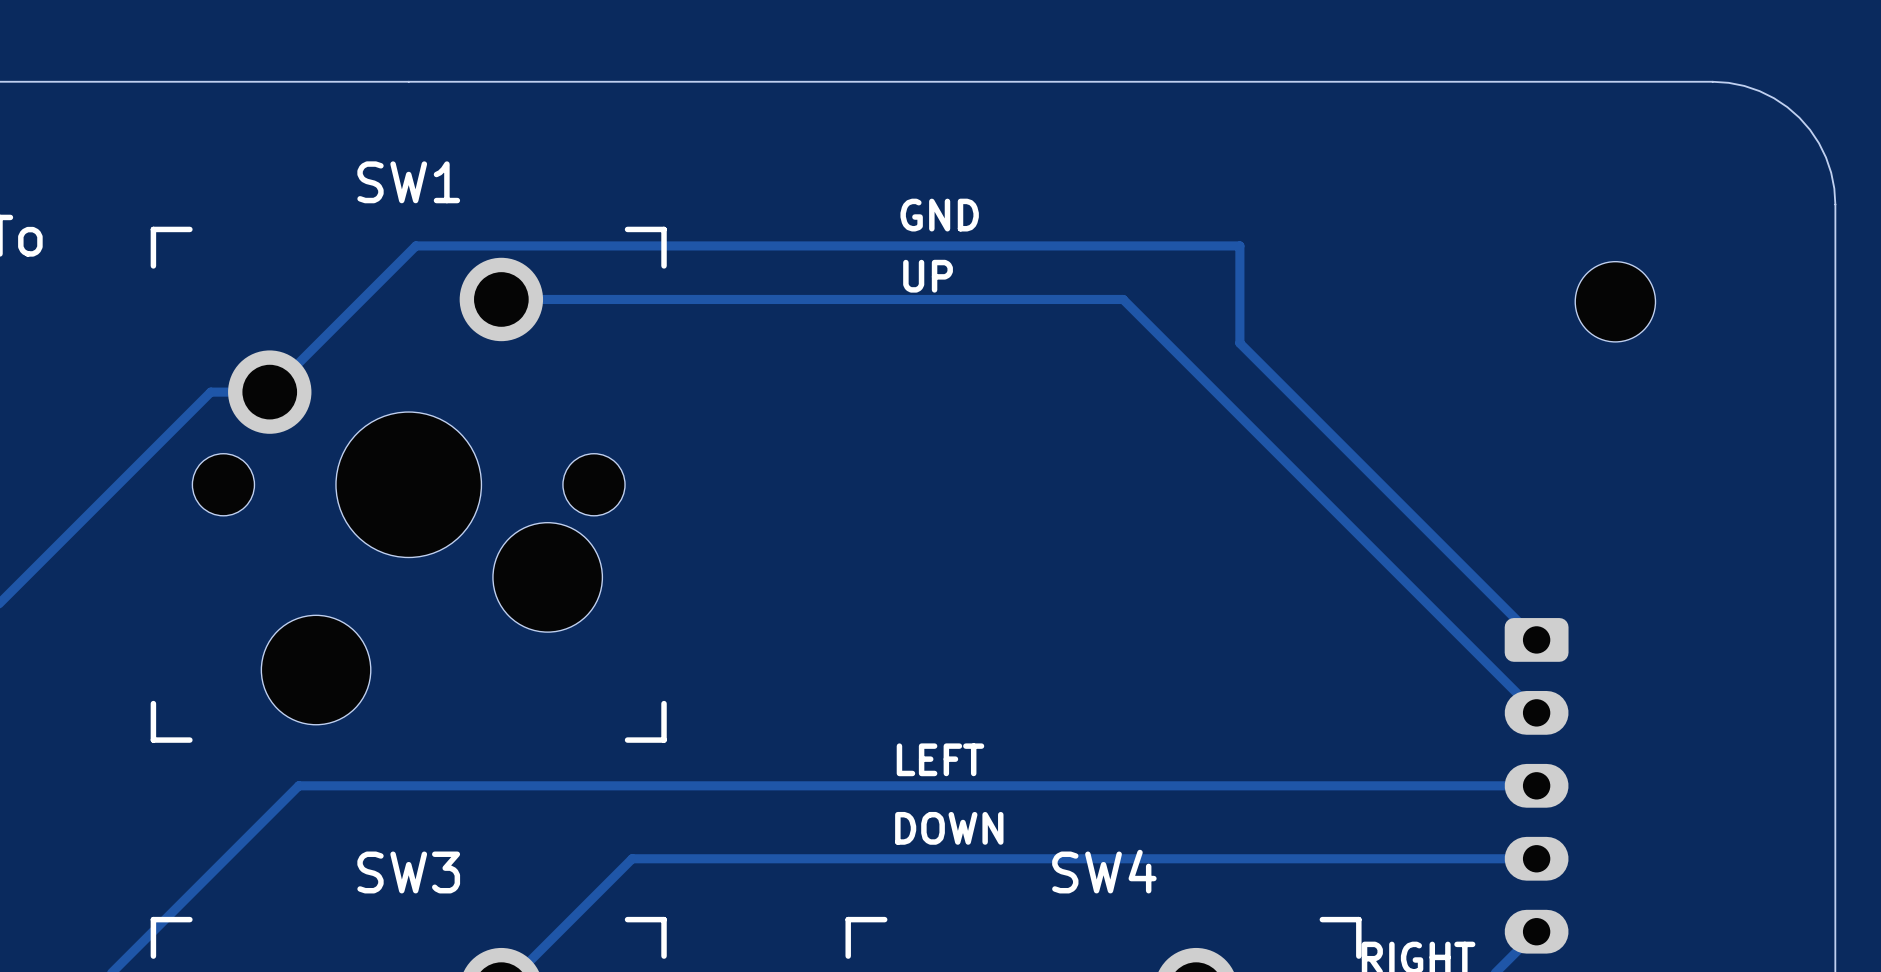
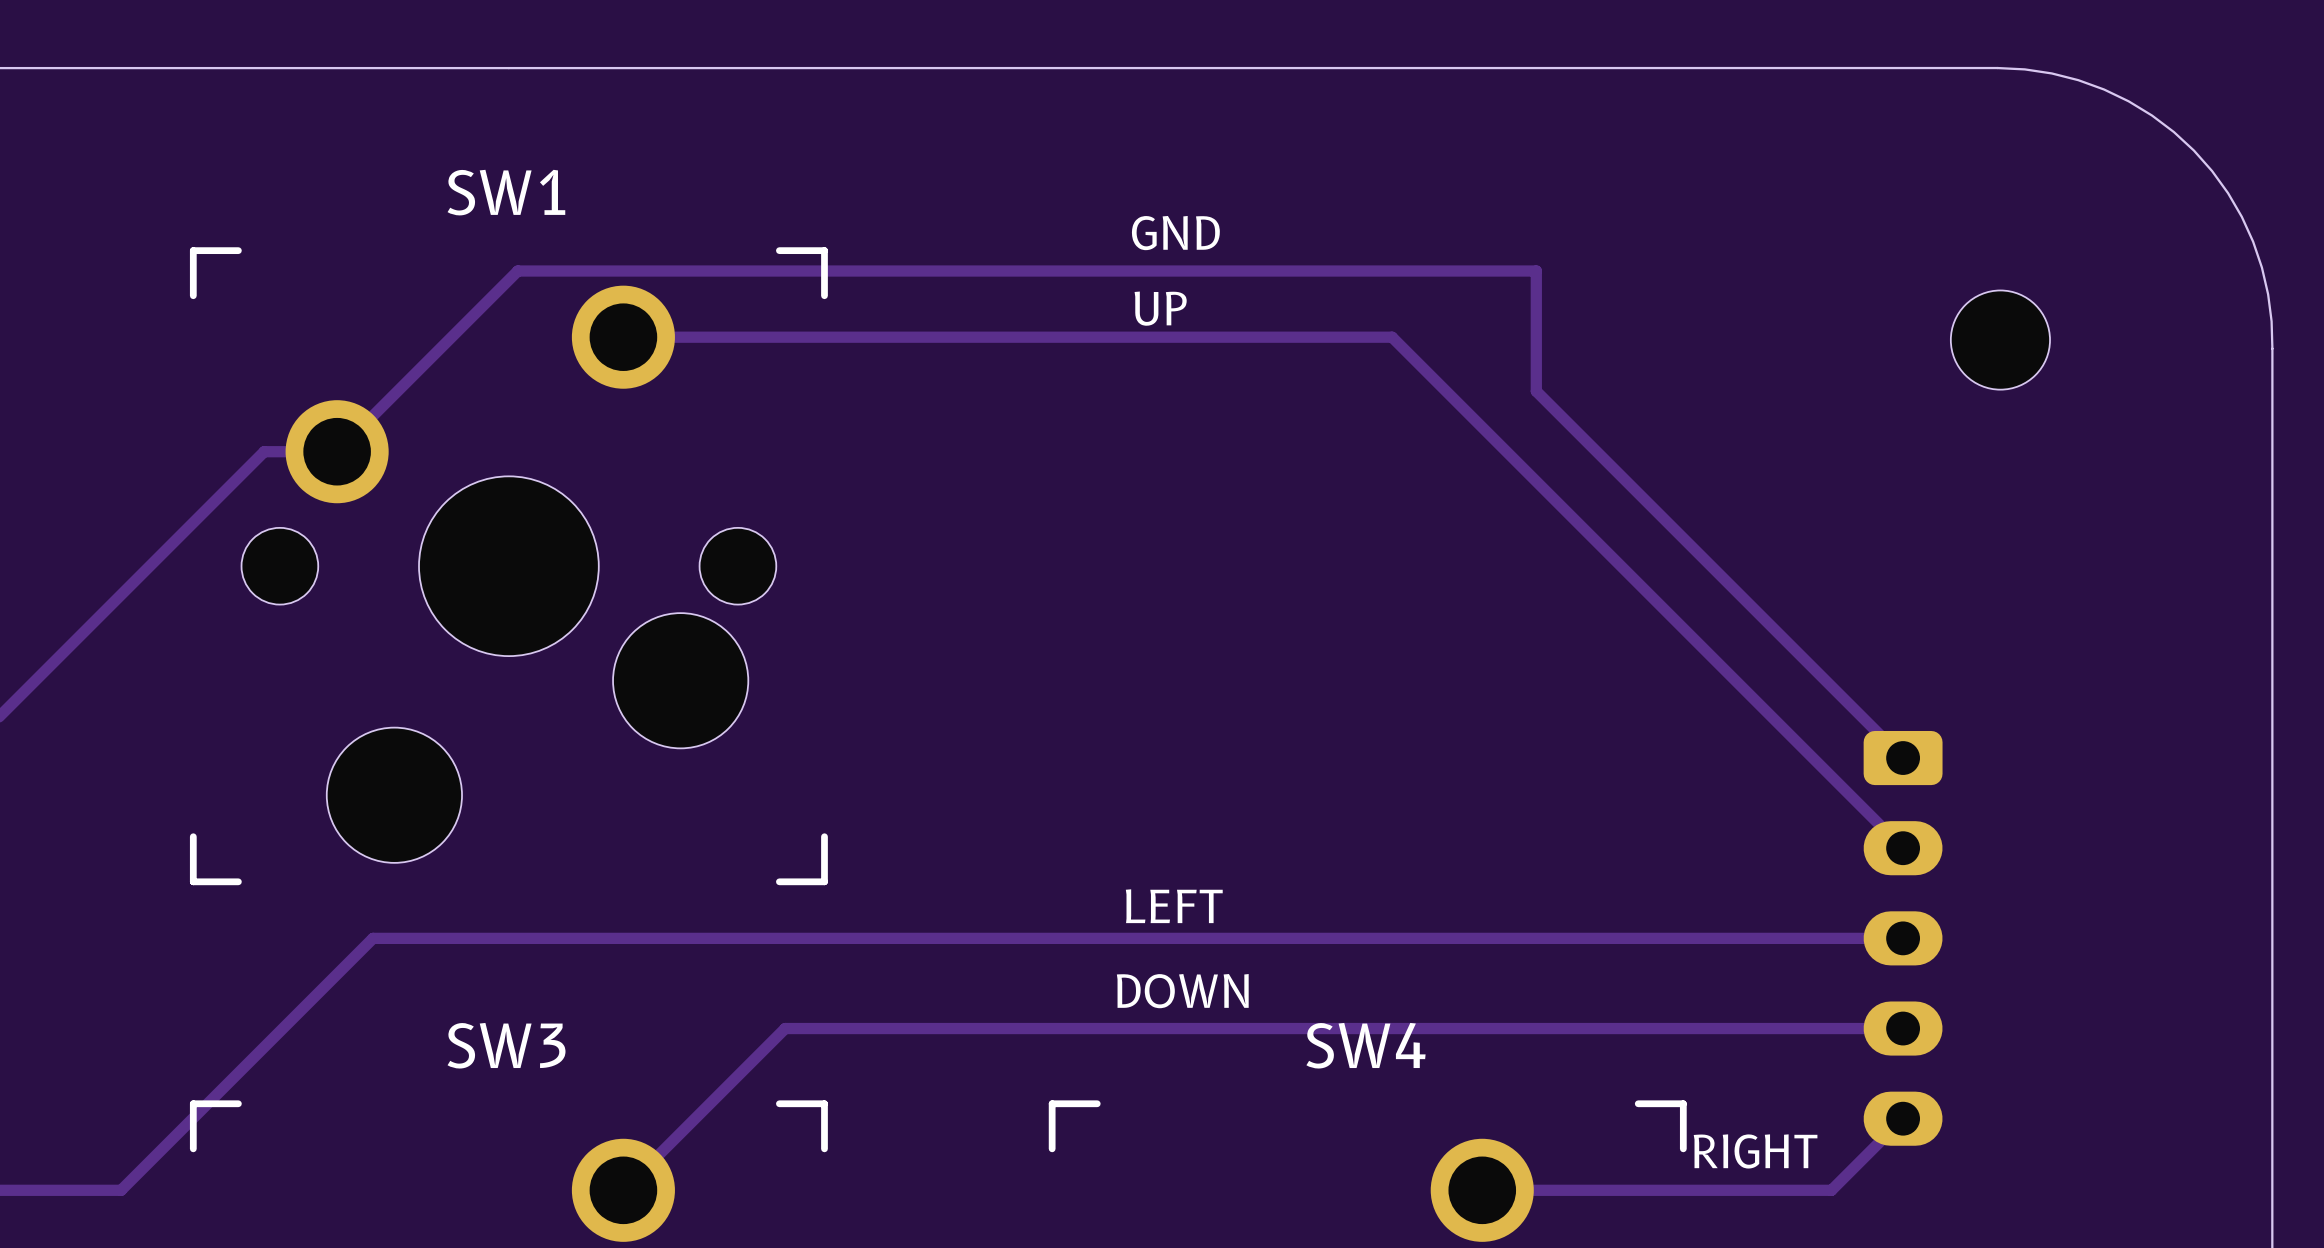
board edge: (408, 81) (1728, 82) (1759, 91) (1787, 107) (1810, 129) (1826, 157) (1834, 188) (1835, 204) (1835, 308) -> (508, 68) (1997, 68) (2051, 73) (2104, 89) (2128, 101) (2173, 132) (2212, 171) (2241, 216) (2261, 267) (2271, 321) (2272, 348)

